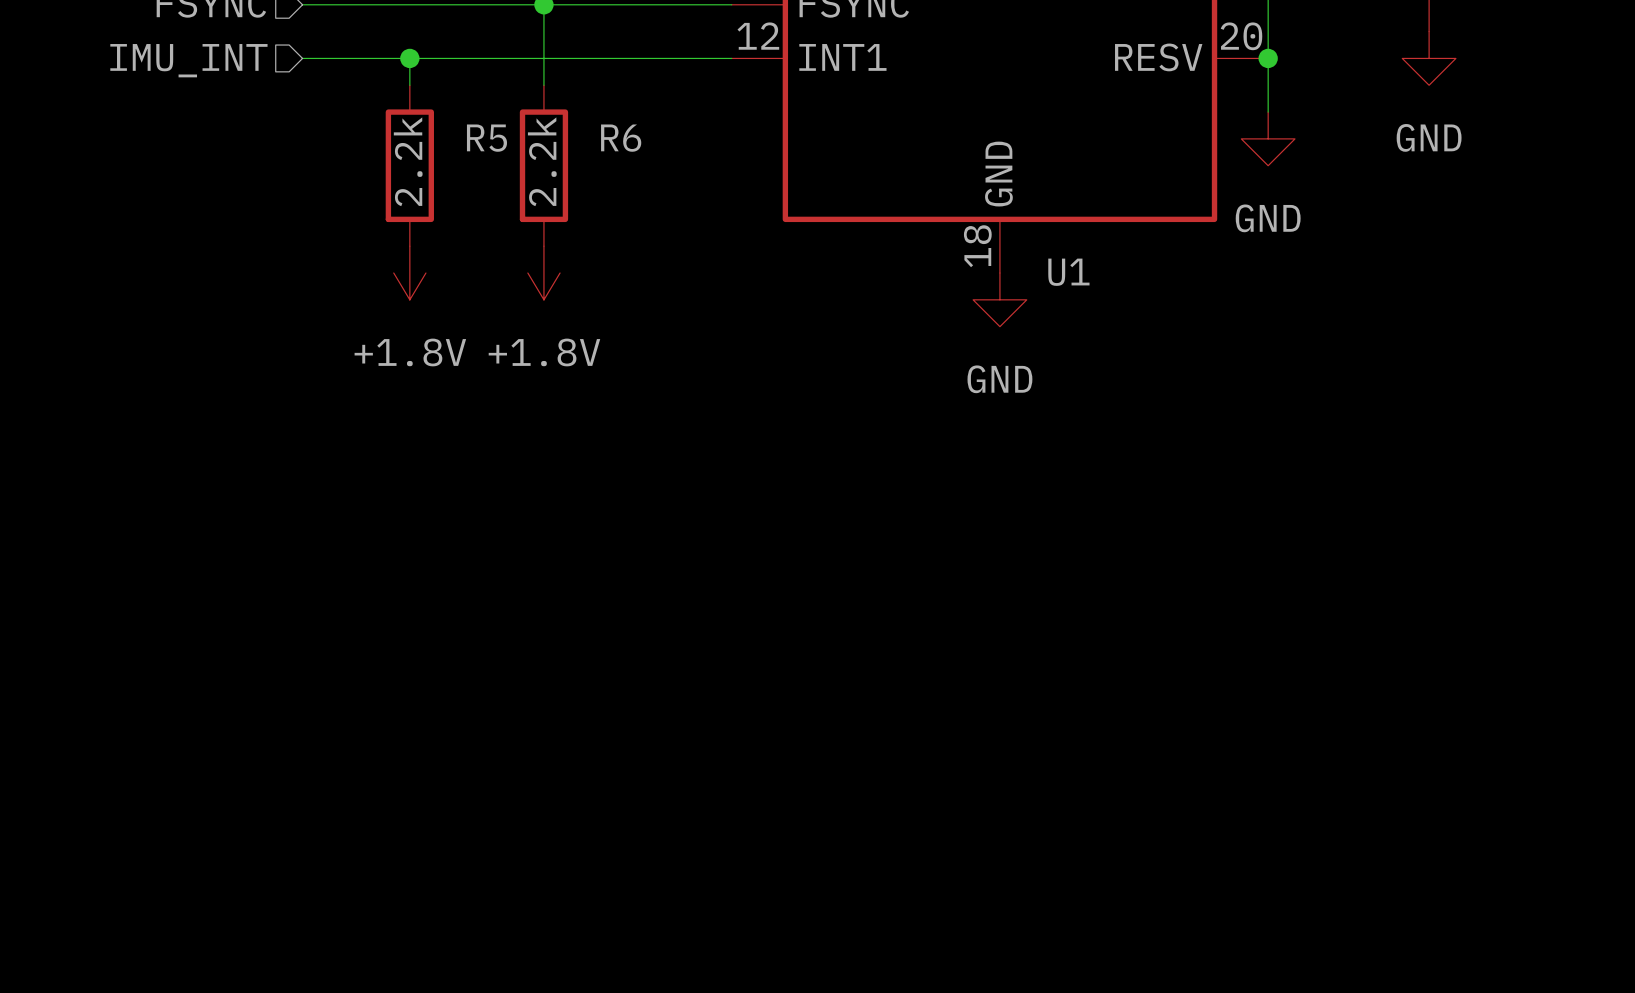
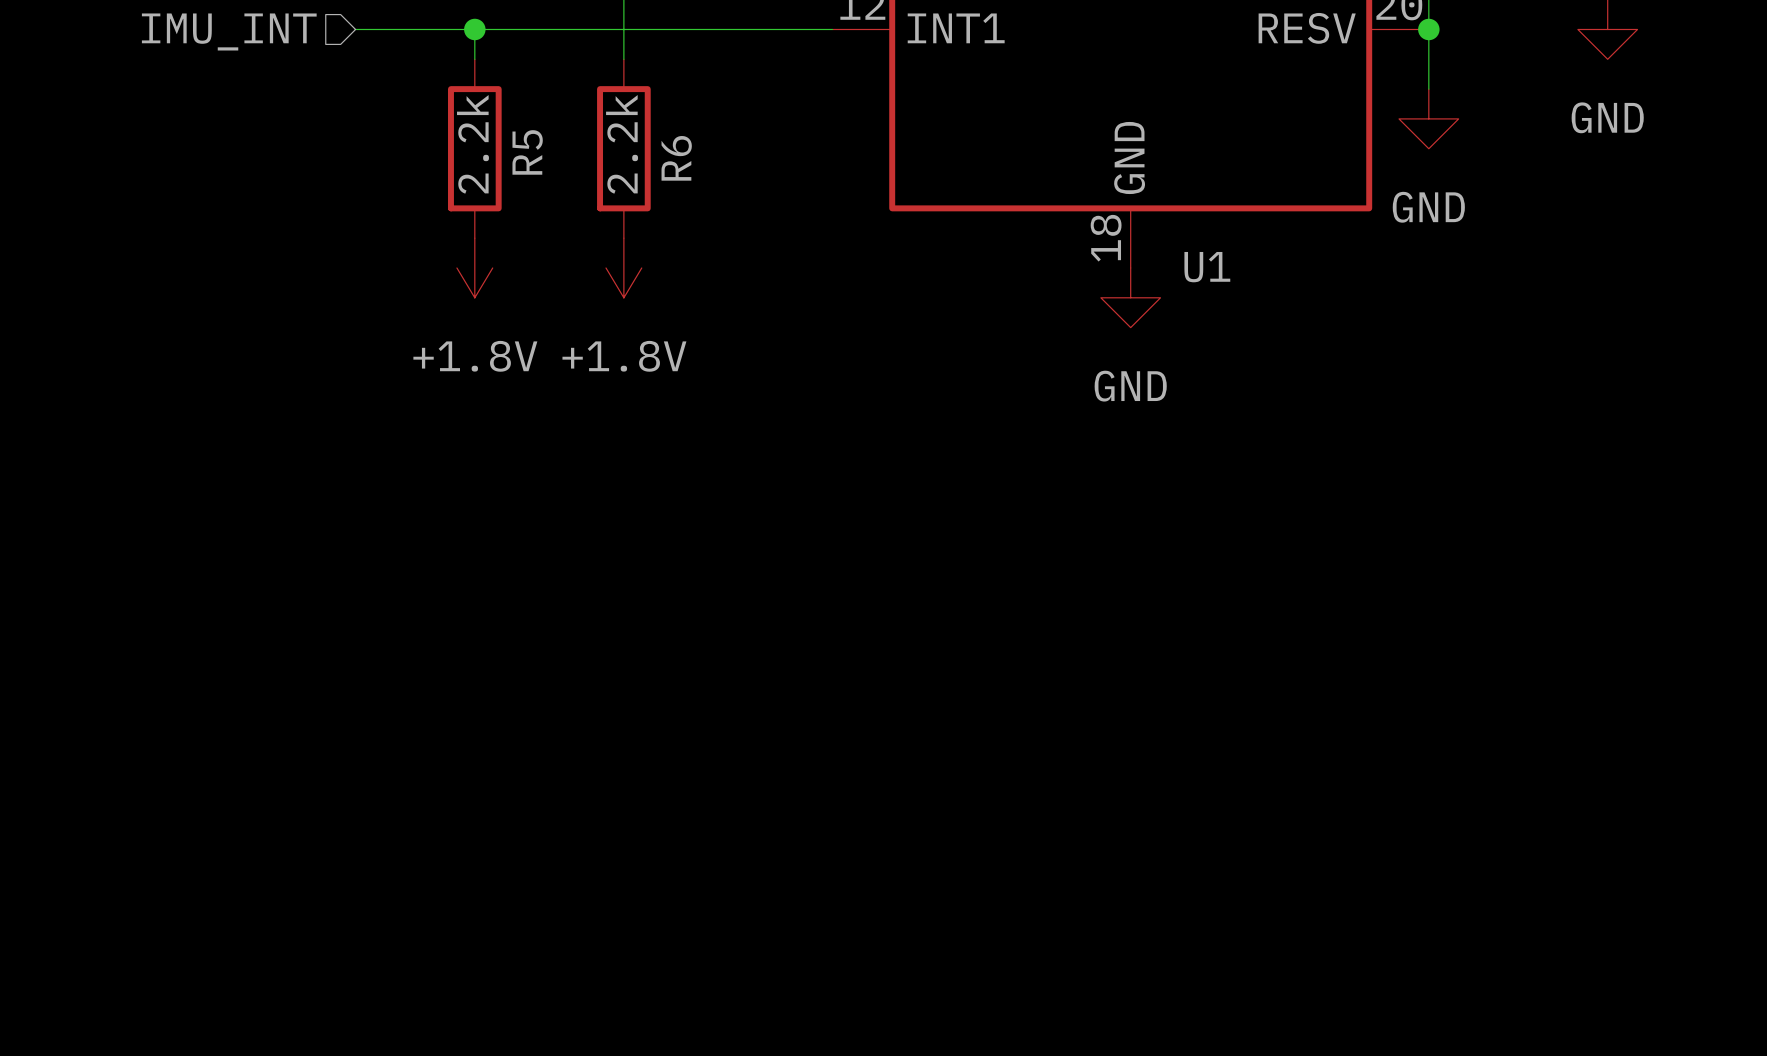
R5 name rotation: 0° (486, 138) -> 90° counterclockwise (527, 152)
R6 name rotation: 0° (621, 138) -> 90° counterclockwise (676, 158)

